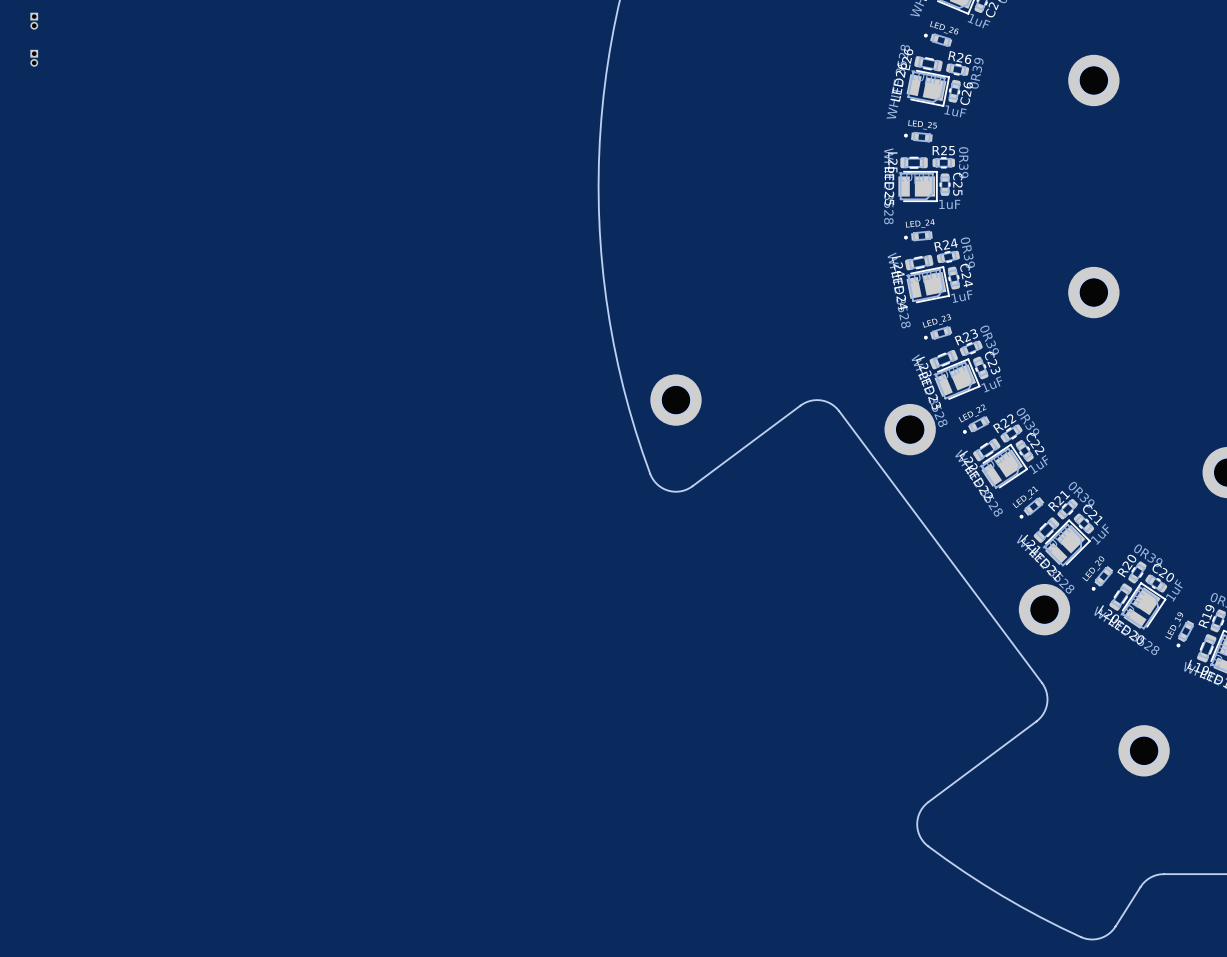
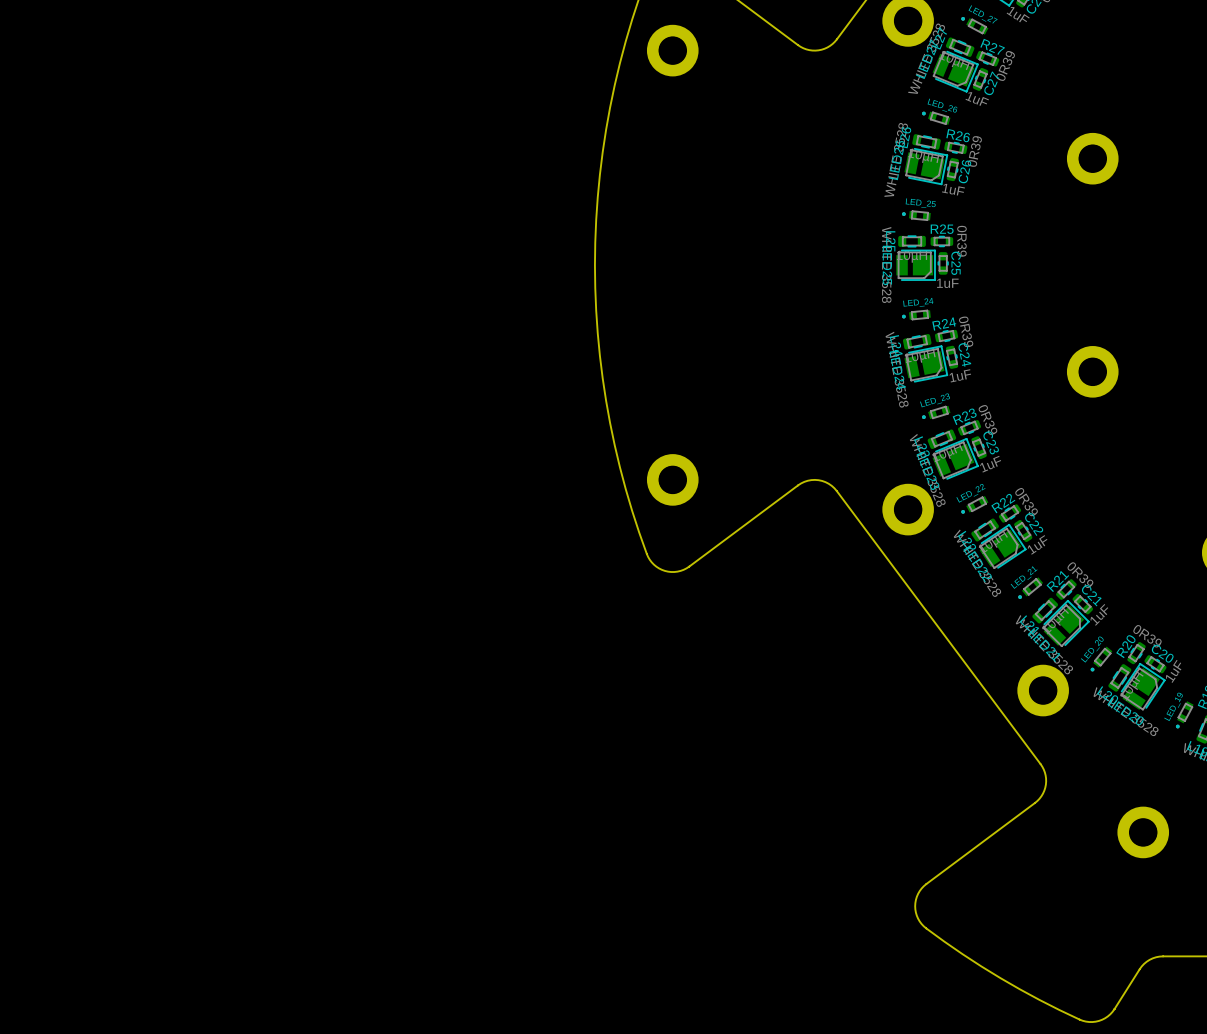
part: (34, 21) -> none
part: (34, 58) -> none

